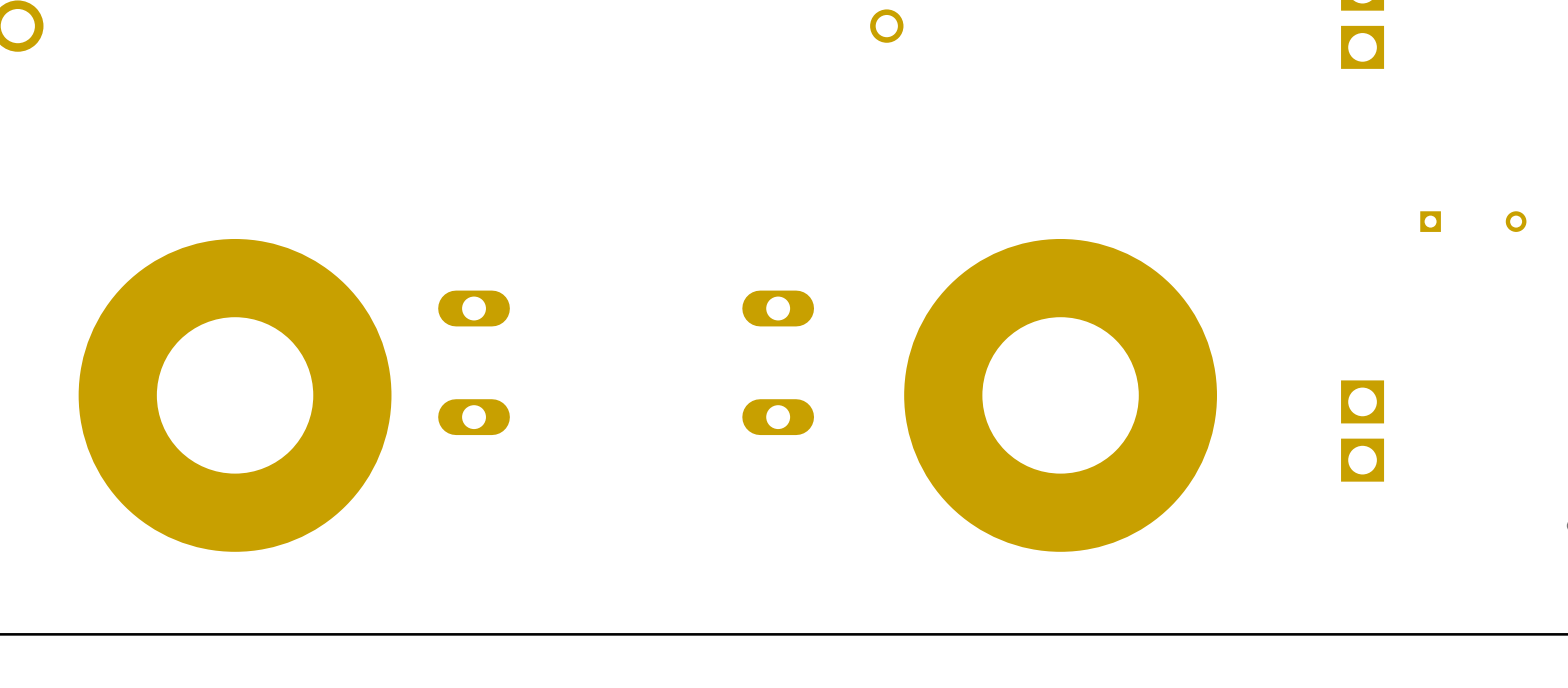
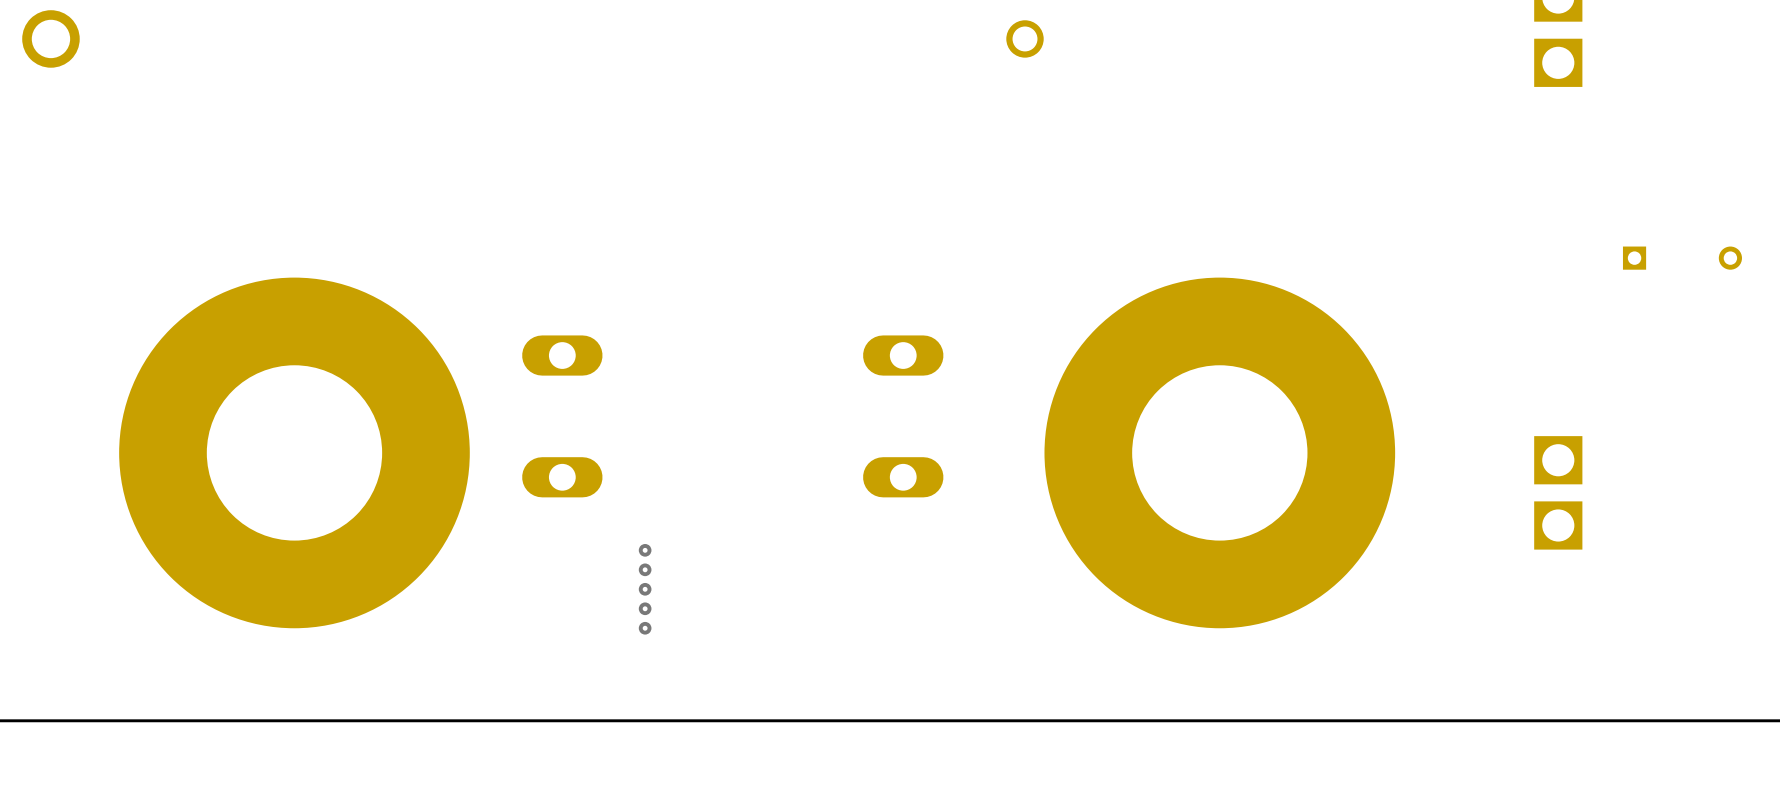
via: none -> (645, 550)
via: none -> (645, 569)
via: none -> (645, 589)
via: none -> (645, 608)
via: none -> (645, 628)

